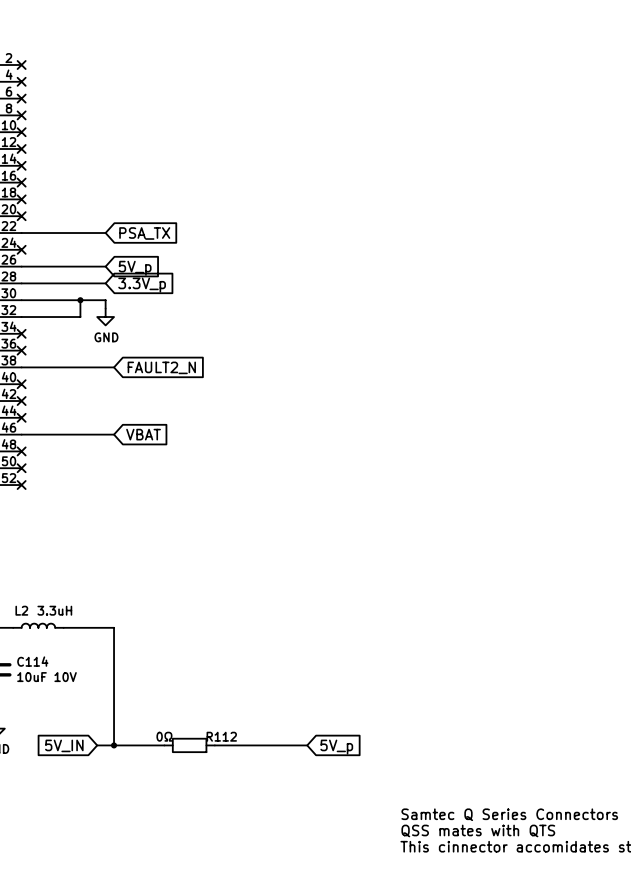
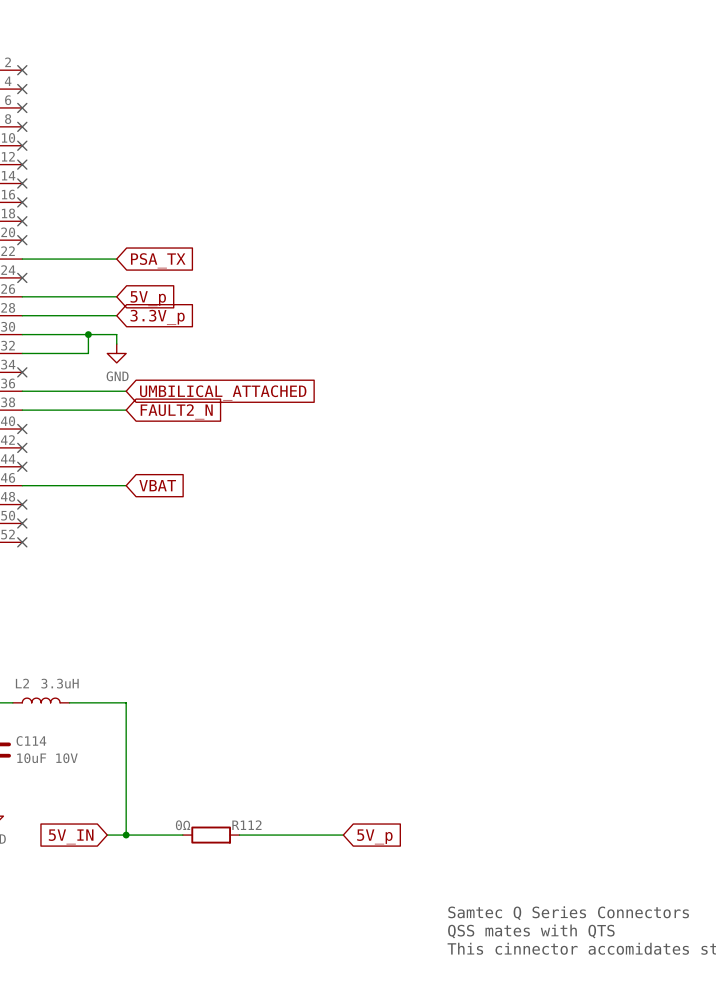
wire: none -> (22, 391) (126, 391)
no-connect mark: (21, 350) -> none
global label: none -> UMBILICAL_ATTACHED (223, 392)

